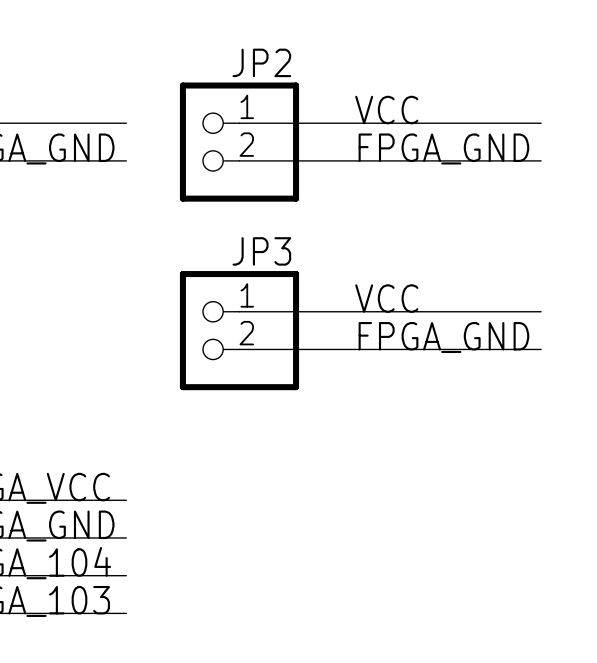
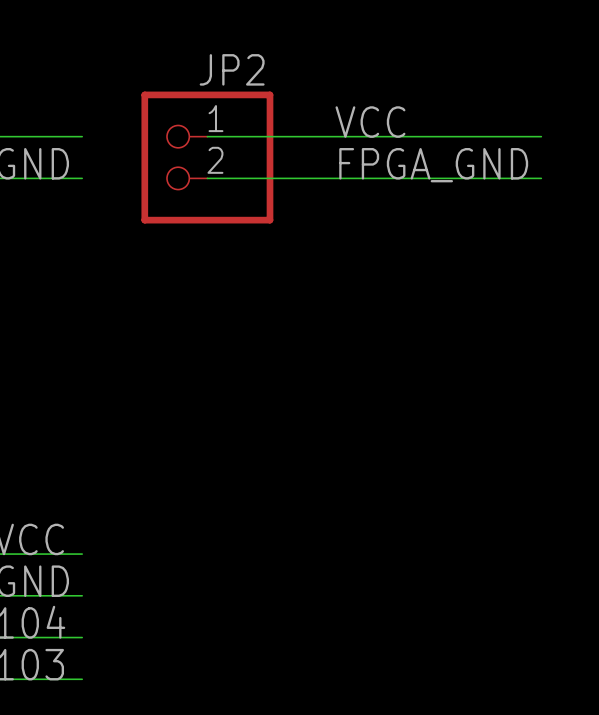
label: VCC (386, 298) -> none
wire: (239, 311) (541, 311) -> none
JP3: (239, 330) -> none
label: FPGA_GND (443, 337) -> none
wire: (239, 349) (541, 349) -> none

